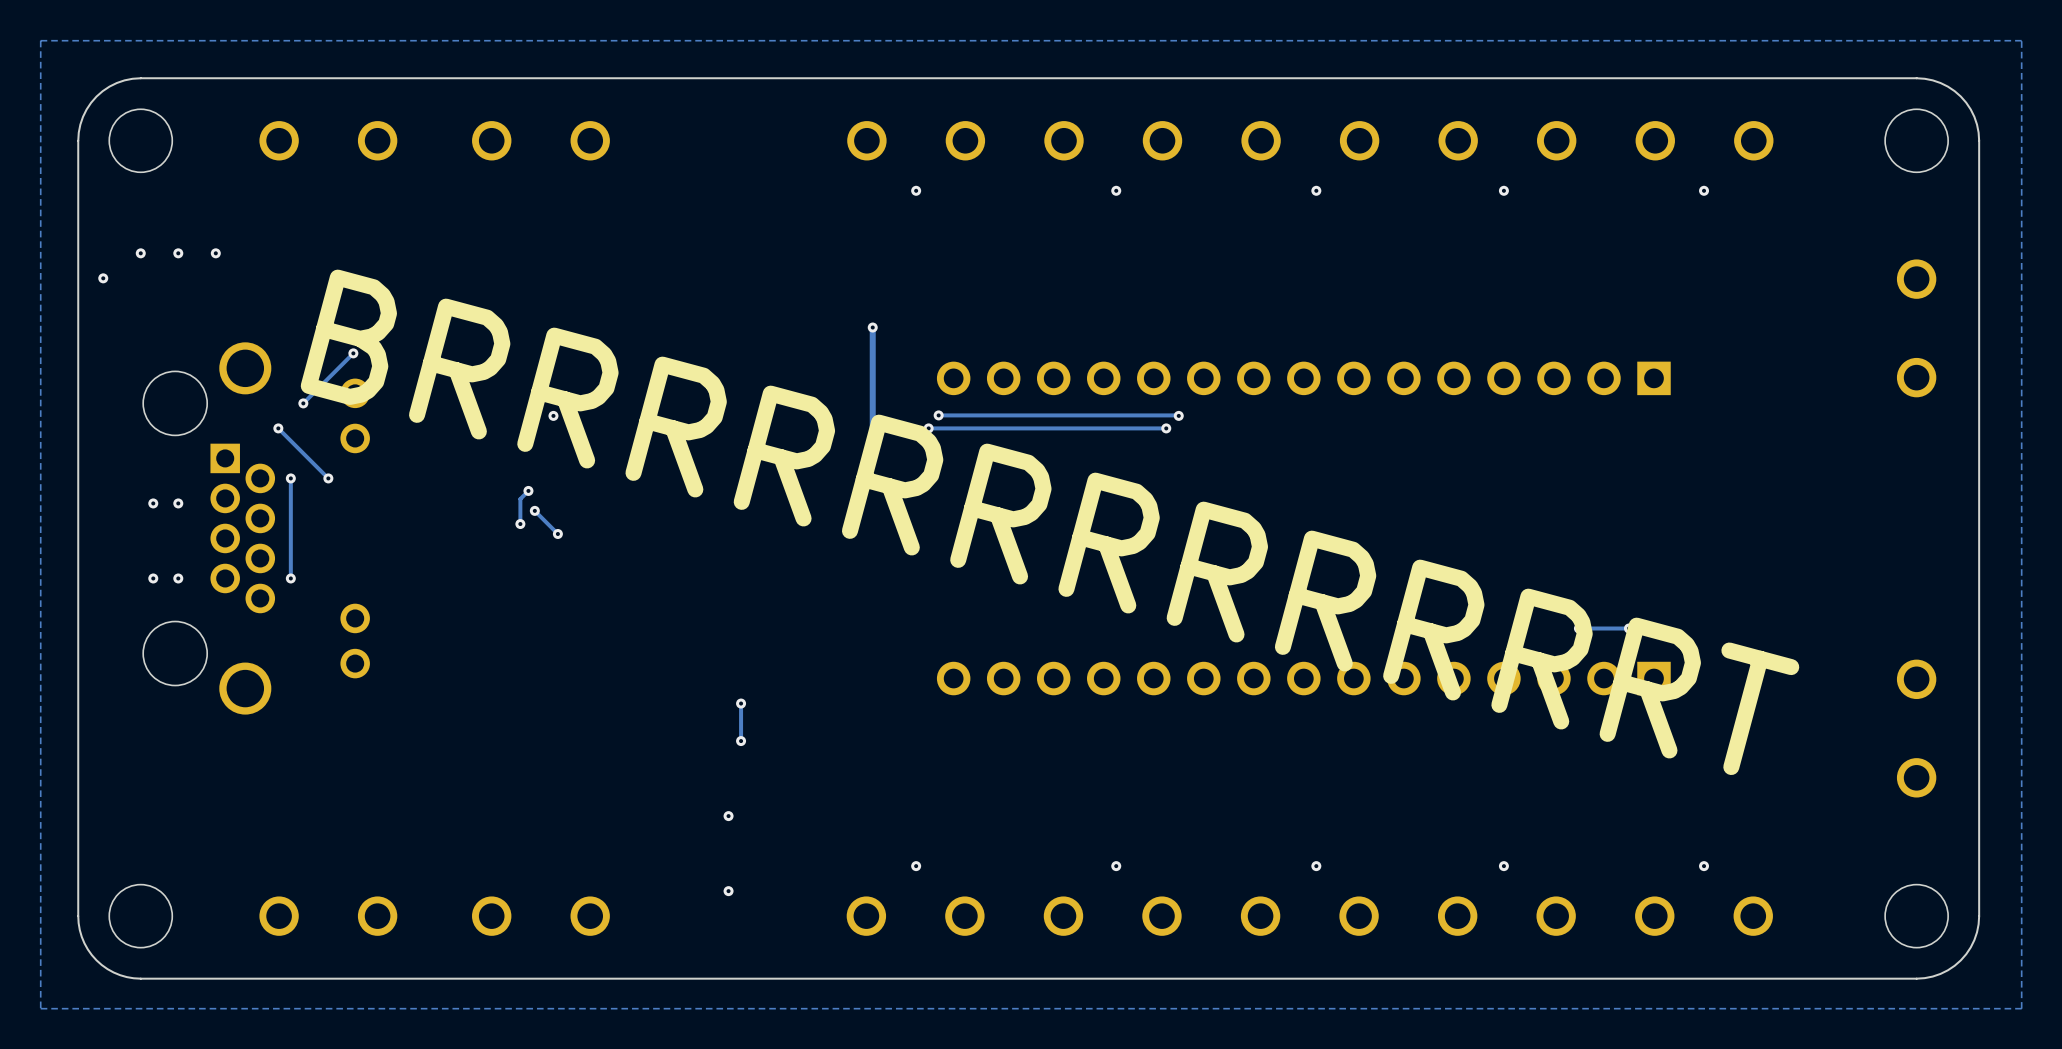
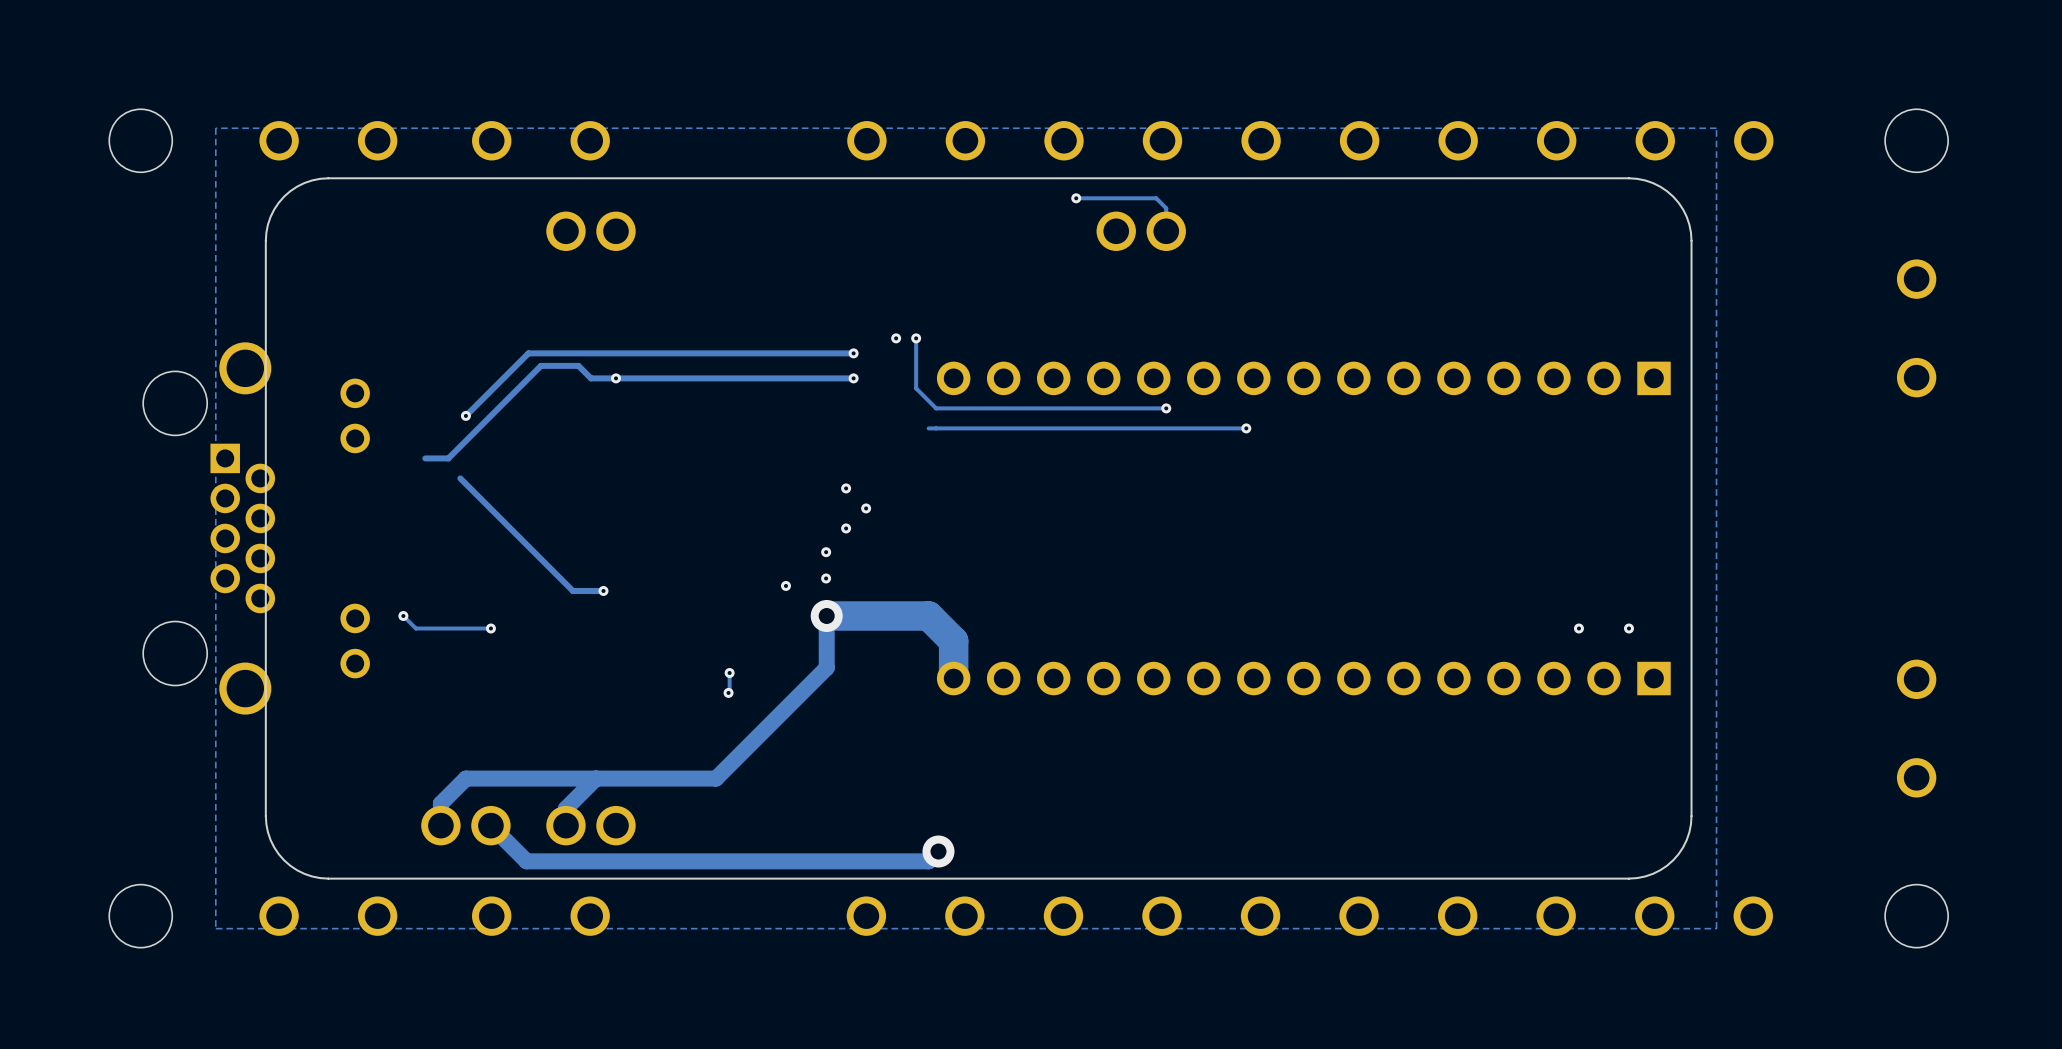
zone outline: (2021, 40) (2021, 1008) (40, 1008) (40, 40) (2021, 40) -> (1716, 128) (1716, 928) (215, 928) (215, 128) (1716, 128)
board edge: (1916, 78) (140, 78) (116, 83) (102, 91) (86, 109) (80, 124) (78, 140) (78, 916) (79, 930) (84, 943) (96, 960) (107, 969) (120, 975) (140, 978) (1916, 978) (1940, 973) (1954, 965) (1970, 947) (1977, 932) (1979, 916) (1979, 140) (1974, 116) (1960, 96) (1940, 83) (1916, 78) -> (1628, 178) (1652, 183) (1673, 196) (1686, 216) (1691, 240) (1691, 816) (1686, 840) (1678, 854) (1667, 865) (1652, 873) (1628, 878) (328, 878) (304, 873) (290, 865) (278, 854) (270, 840) (265, 816) (265, 240) (270, 216) (278, 202) (290, 191) (304, 183) (328, 178) (1628, 178)
via: (916, 190) -> none
via position: (1116, 190) -> (1076, 198)
via: (1316, 190) -> none
via: (1503, 190) -> none
via: (1704, 190) -> none
track: none -> (1076, 198) (1156, 198) (1166, 208) (1166, 231)
part: none -> (590, 231)
part: none -> (1141, 231)
via: (140, 253) -> none
via: (178, 253) -> none
via: (215, 253) -> none
via: (103, 278) -> none
track: (872, 327) (872, 443) -> none
via: (872, 327) -> none
via: none -> (896, 338)
track: none -> (916, 338) (916, 388) (936, 408) (1166, 408)
via: none -> (916, 338)
track: (353, 353) (303, 403) -> none
via: (353, 353) -> none
track: none -> (853, 353) (528, 353) (465, 415)
via: none -> (853, 353)
via: none -> (616, 378)
track: none -> (853, 378) (590, 378) (578, 365) (540, 365) (448, 458) (425, 458)
via: none -> (853, 378)
via: (303, 403) -> none
via: none -> (1166, 408)
via: none -> (465, 415)
via: (553, 415) -> none
track: (938, 415) (1178, 415) -> none
via: (938, 415) -> none
via: (1178, 415) -> none
track: (278, 428) (328, 478) -> none
via: (278, 428) -> none
via: (928, 428) -> none
via: (1166, 428) -> none
track: none -> (1246, 428) (1166, 428)
via: none -> (1246, 428)
track: (290, 478) (290, 578) -> none
via: (290, 478) -> none
via: (328, 478) -> none
track: none -> (460, 478) (572, 590) (603, 590)
via: none -> (846, 488)
track: (528, 490) (520, 499) (520, 524) -> none
via: (528, 490) -> none
via: (153, 503) -> none
via: (178, 503) -> none
via: none -> (866, 508)
track: (534, 510) (557, 533) -> none
via: (534, 510) -> none
text: BRRRRRRRRRRRRT (1050, 522) -> none
via: (520, 524) -> none
via: none -> (846, 528)
via: (557, 533) -> none
via: none -> (826, 552)
via: (153, 578) -> none
via: (178, 578) -> none
via: (290, 578) -> none
via: none -> (826, 578)
via: none -> (785, 585)
via: none -> (603, 590)
track: none -> (403, 616) (415, 628) (490, 628)
via: none -> (403, 616)
via: none -> (826, 616)
via: none -> (490, 628)
track: (1628, 628) (1578, 628) -> none
track: none -> (729, 672) (728, 692)
via: none -> (729, 672)
track: none -> (953, 678) (953, 641) (928, 616) (826, 616) (826, 667) (716, 778) (465, 778) (440, 803) (440, 825)
via: none -> (728, 692)
track: (741, 703) (741, 741) -> none
via: (741, 703) -> none
via: (741, 741) -> none
track: none -> (595, 778) (565, 808) (565, 825)
via: (728, 816) -> none
part: none -> (465, 825)
track: none -> (490, 825) (526, 861) (928, 861) (938, 851)
part: none -> (590, 825)
via: none -> (938, 851)
via: (916, 866) -> none
via: (1116, 866) -> none
via: (1316, 866) -> none
via: (1503, 866) -> none
via: (1704, 866) -> none
via: (728, 891) -> none

